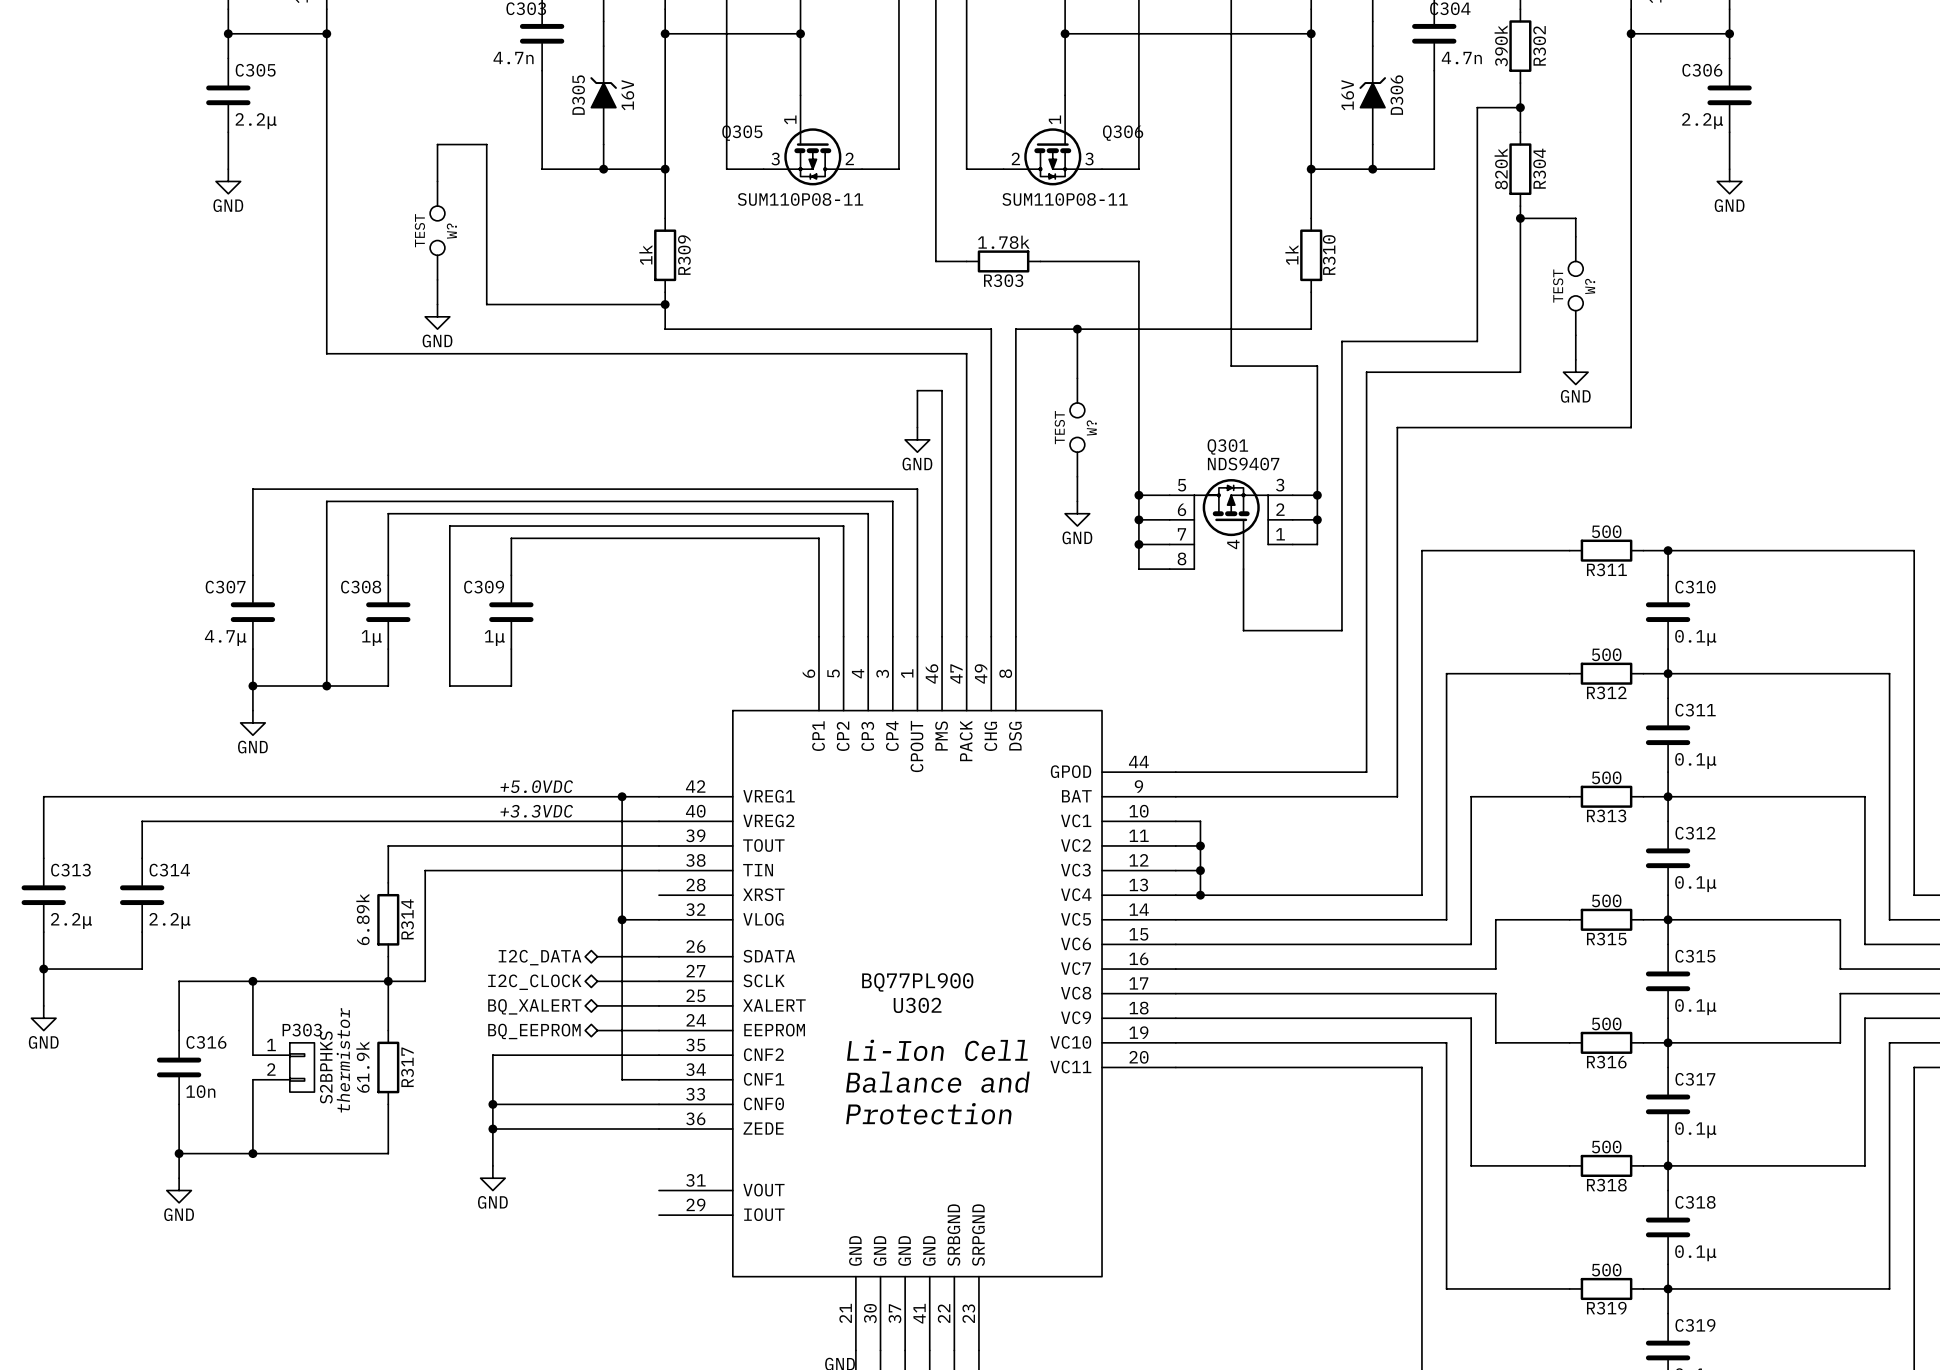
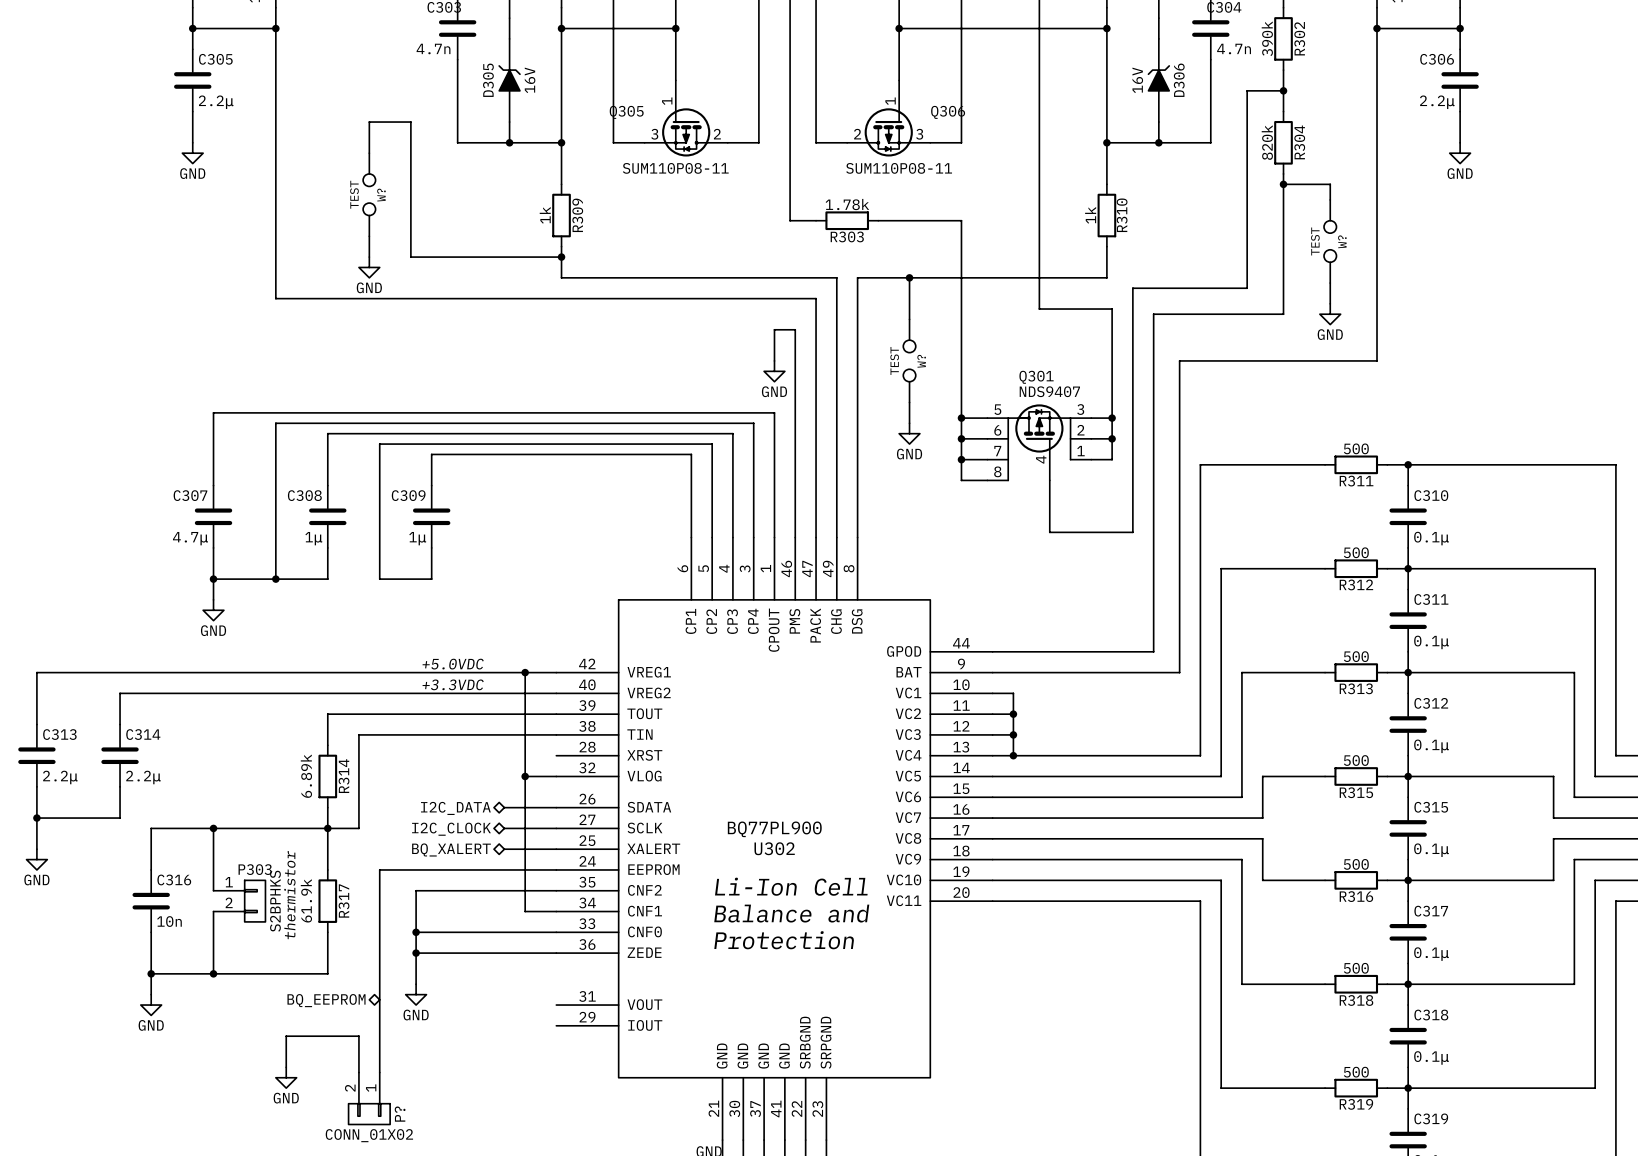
wire: none -> (504, 869) (379, 869) (379, 1072)
hierarchical label position: BQ_EEPROM (534, 1031) -> BQ_EEPROM (326, 1000)
wire: none -> (286, 1067) (286, 1036) (358, 1036) (358, 1072)
power symbol: none -> GND (286, 1077)
P?: none -> CONN_01X02 (369, 1098)

